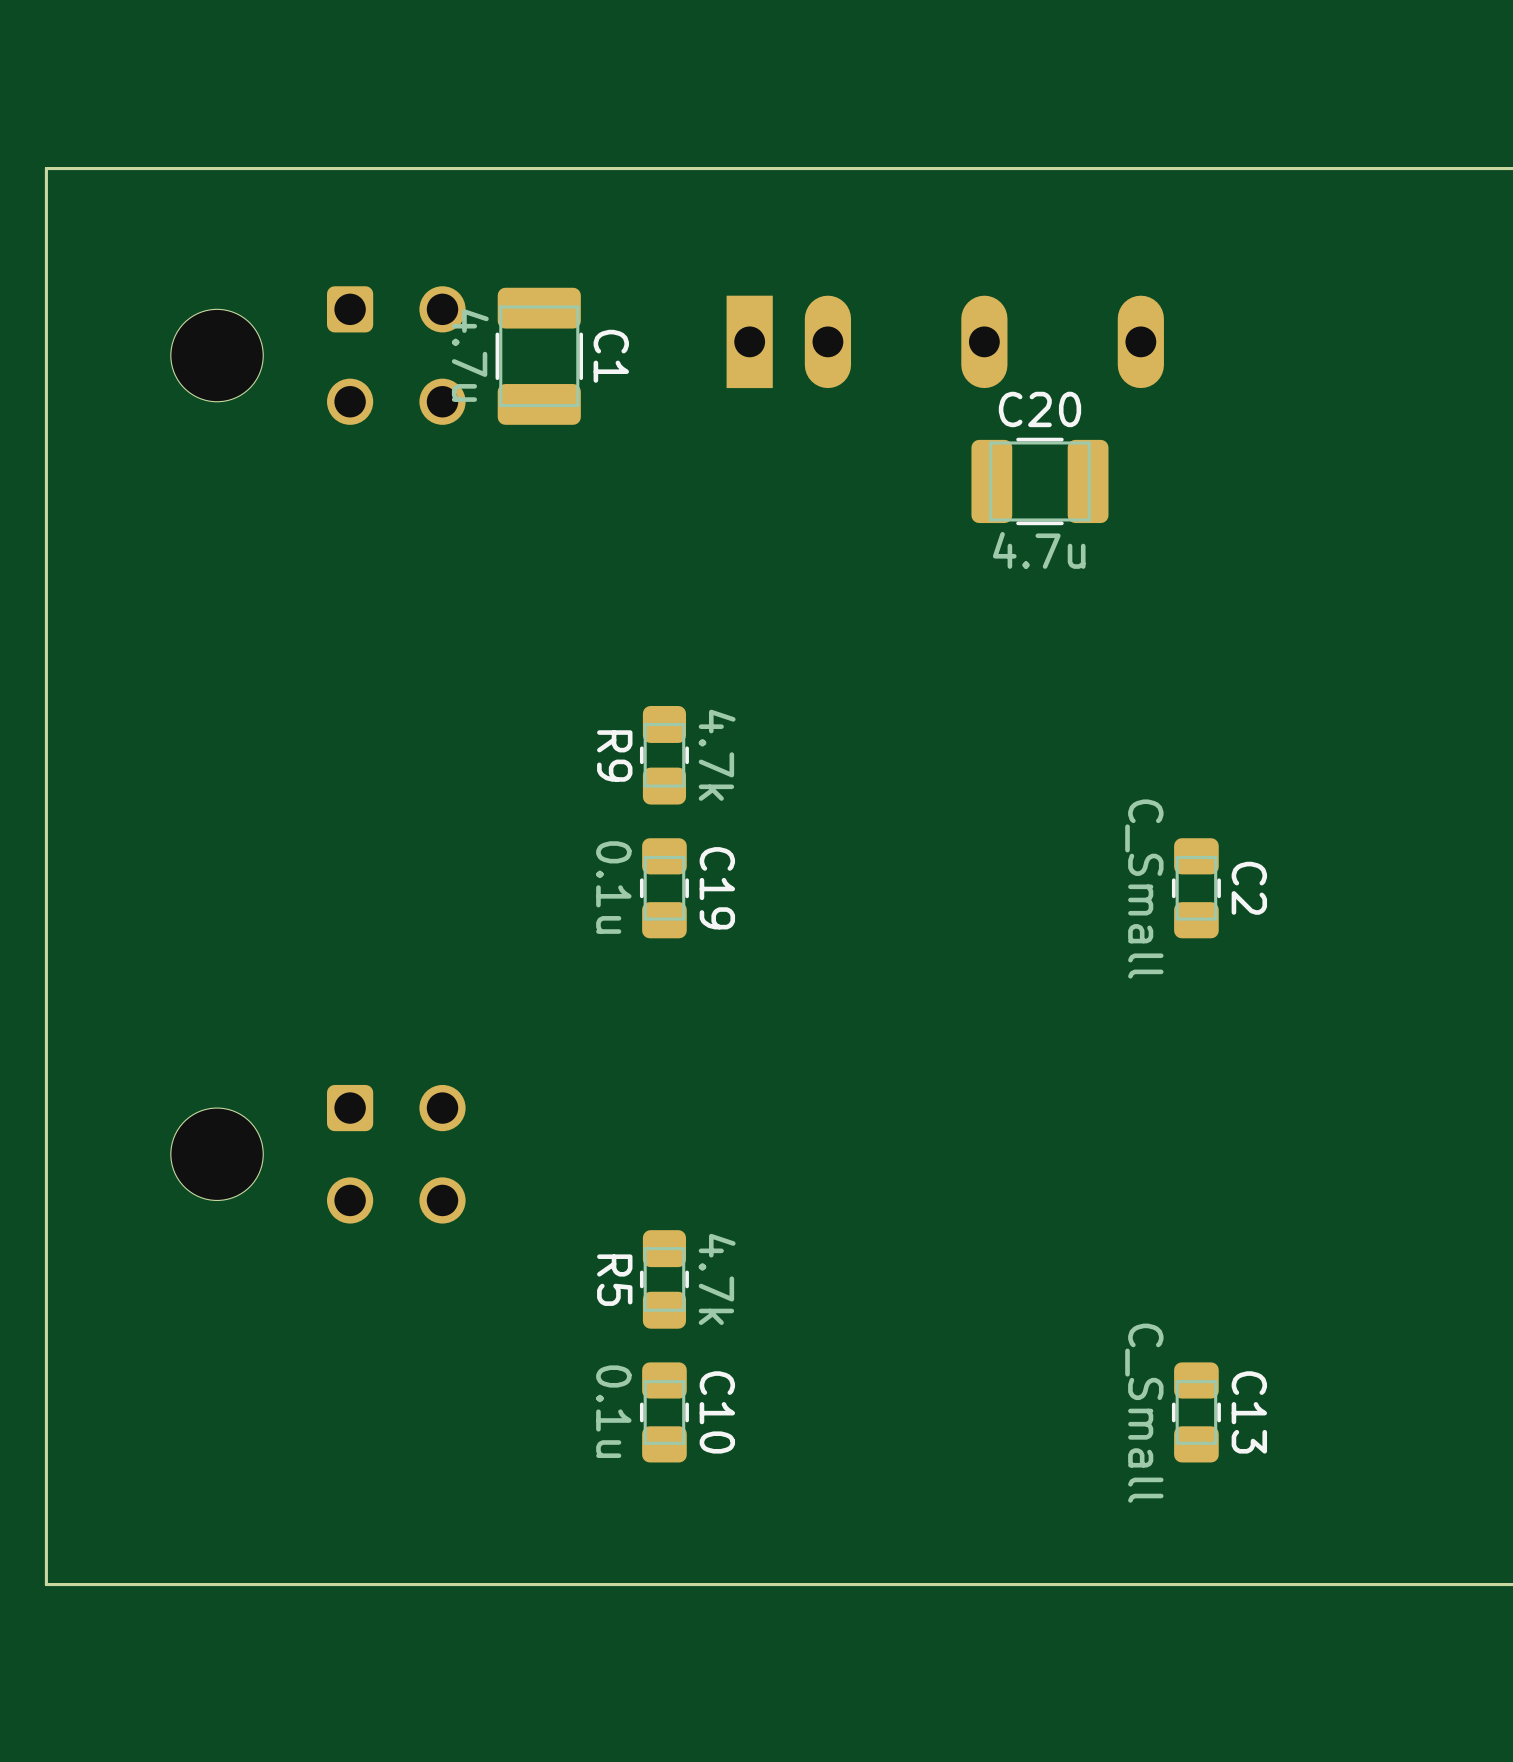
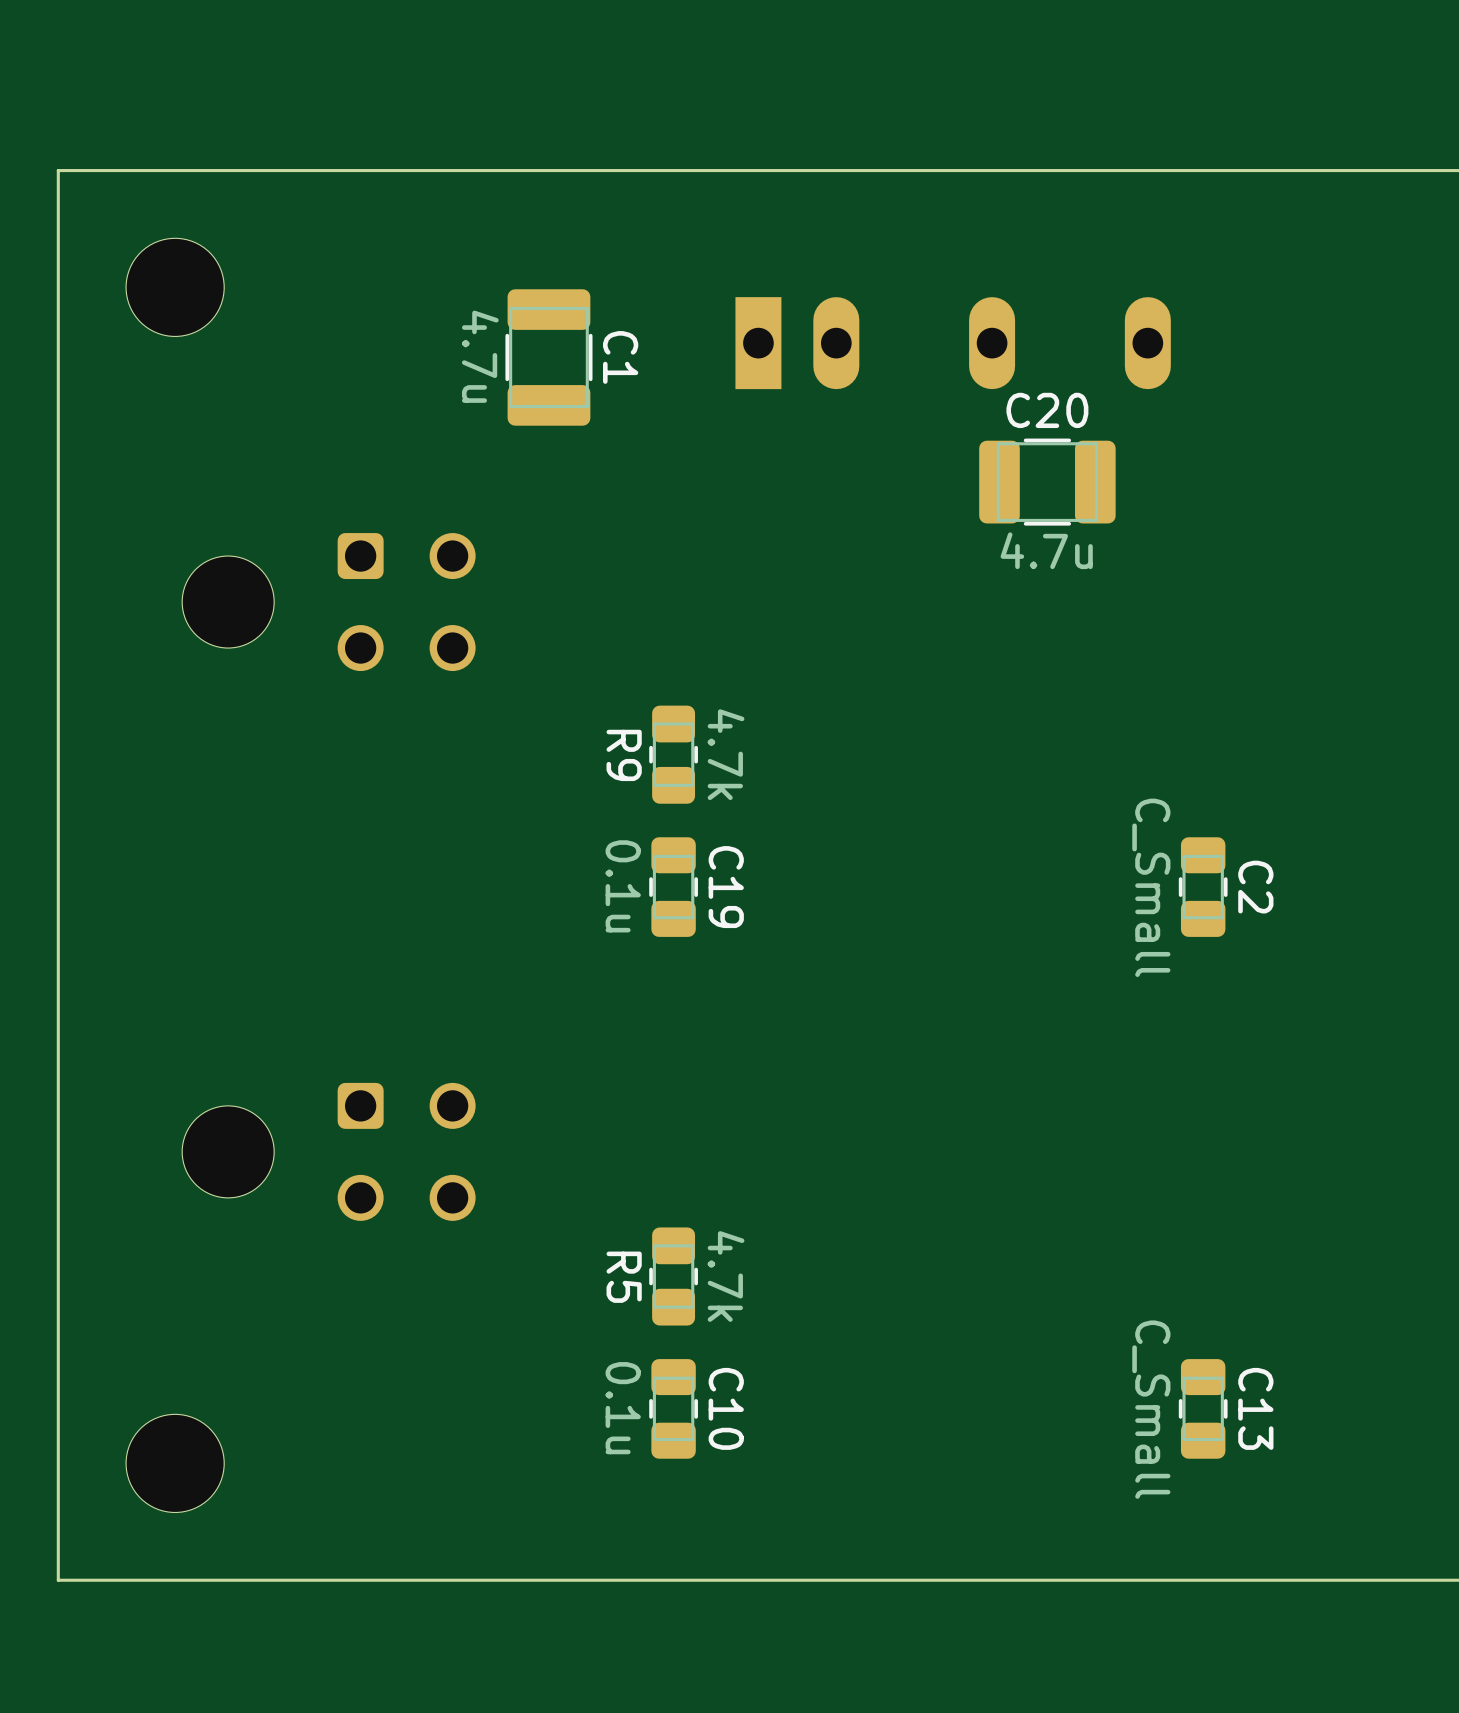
part: none -> (175, 287)
part position: (318, 355) -> (328, 602)
part: none -> (175, 1463)

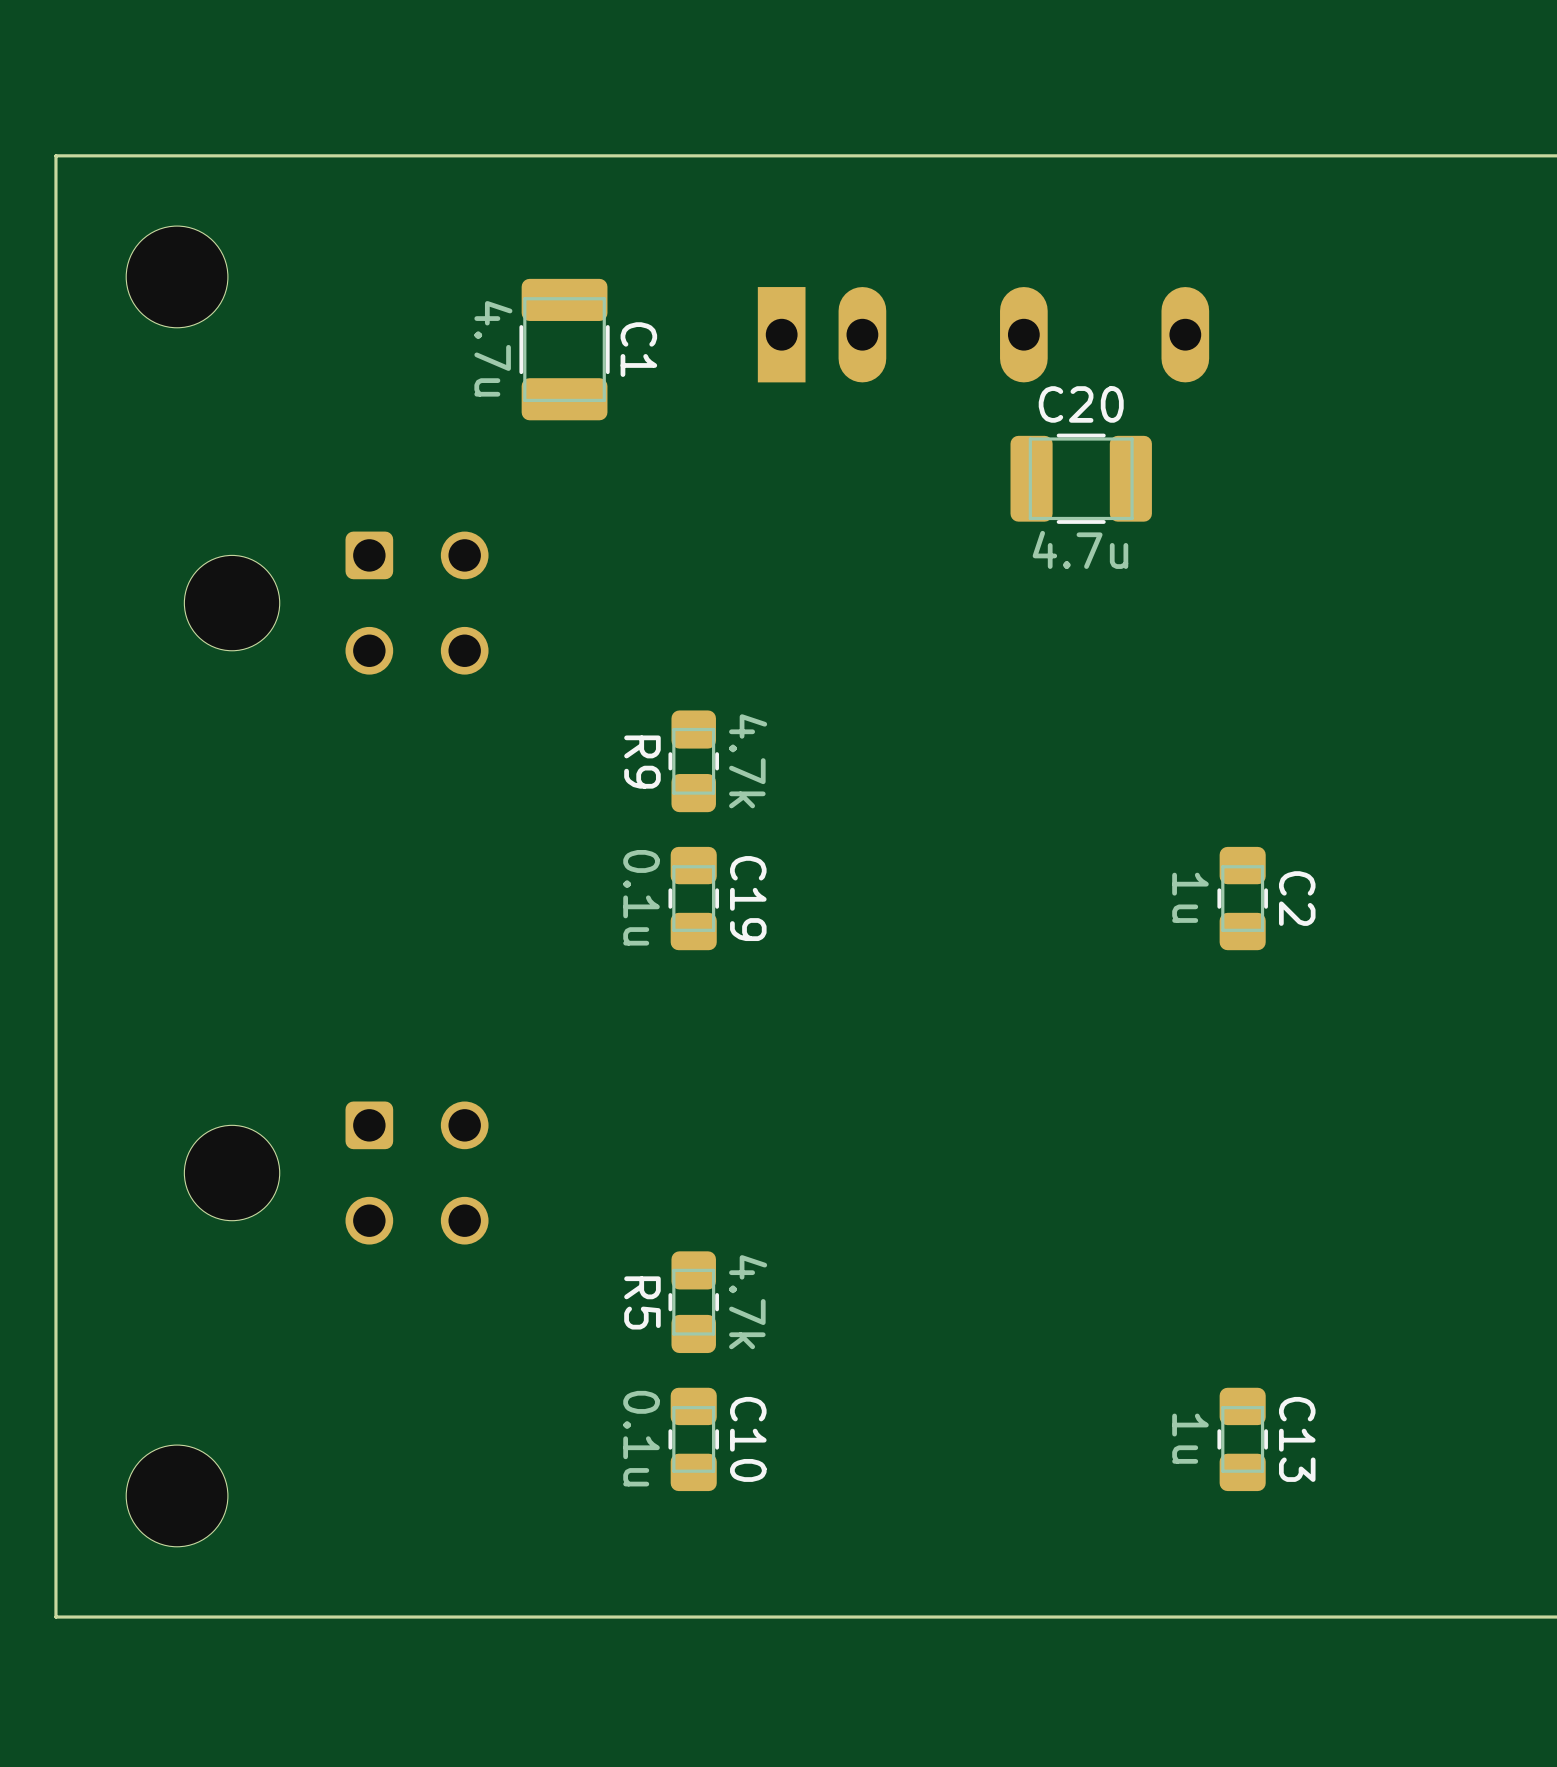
C2 value: C_Small (1151, 887) -> 1u (1190, 897)
C13 value: C_Small (1151, 1409) -> 1u (1190, 1438)

